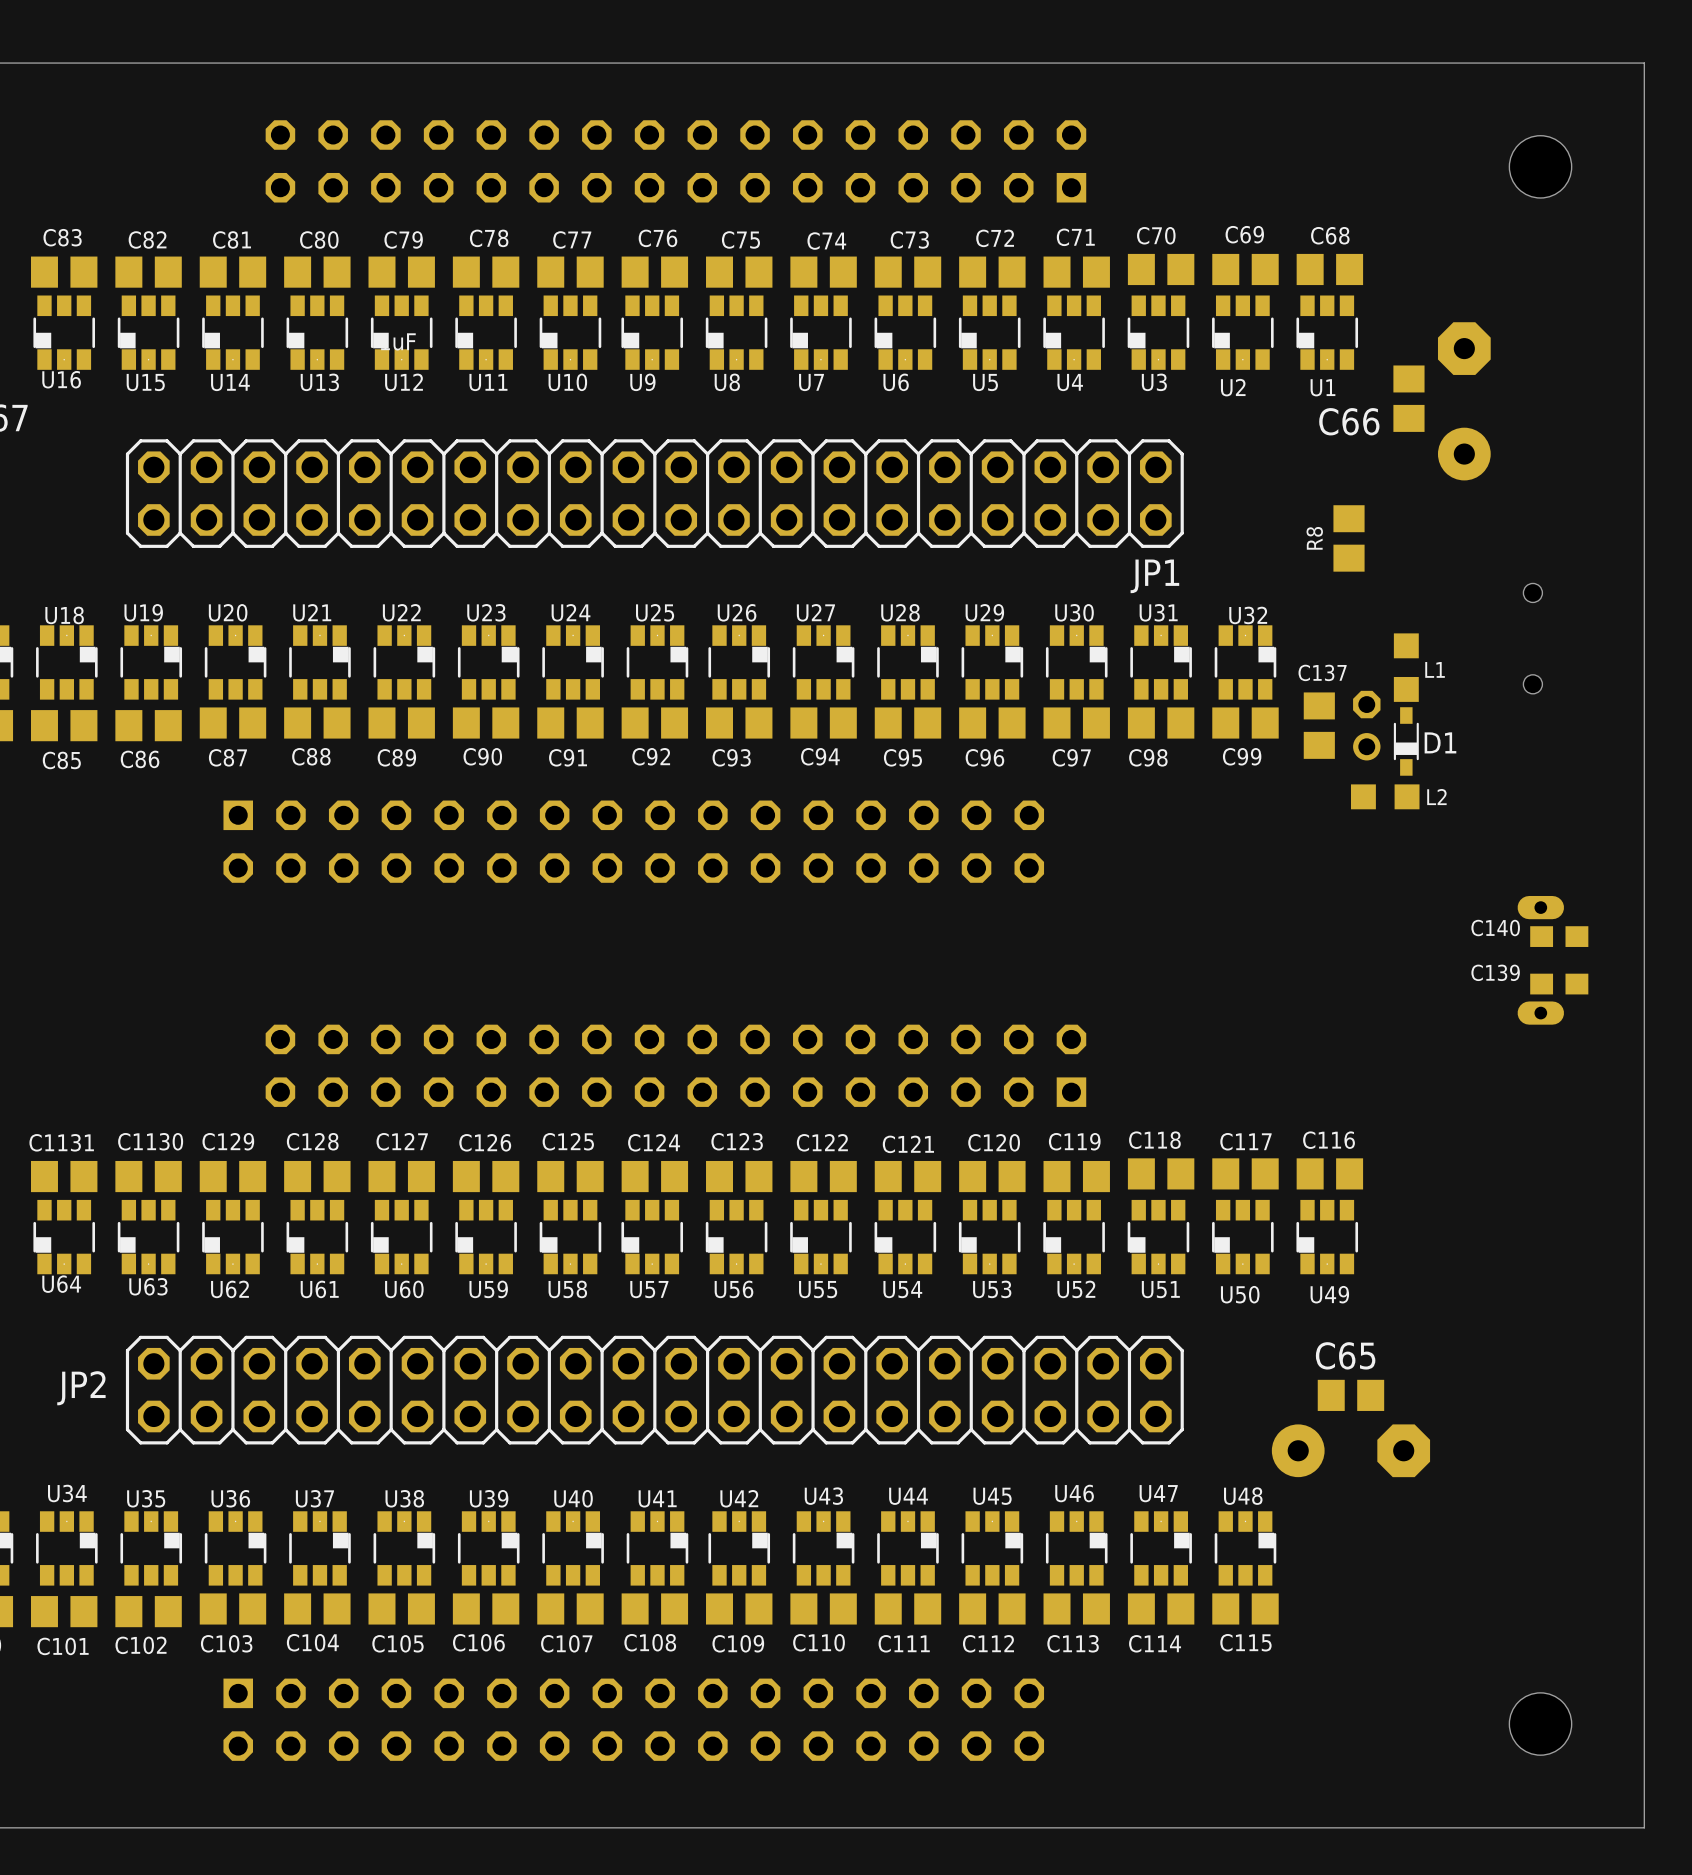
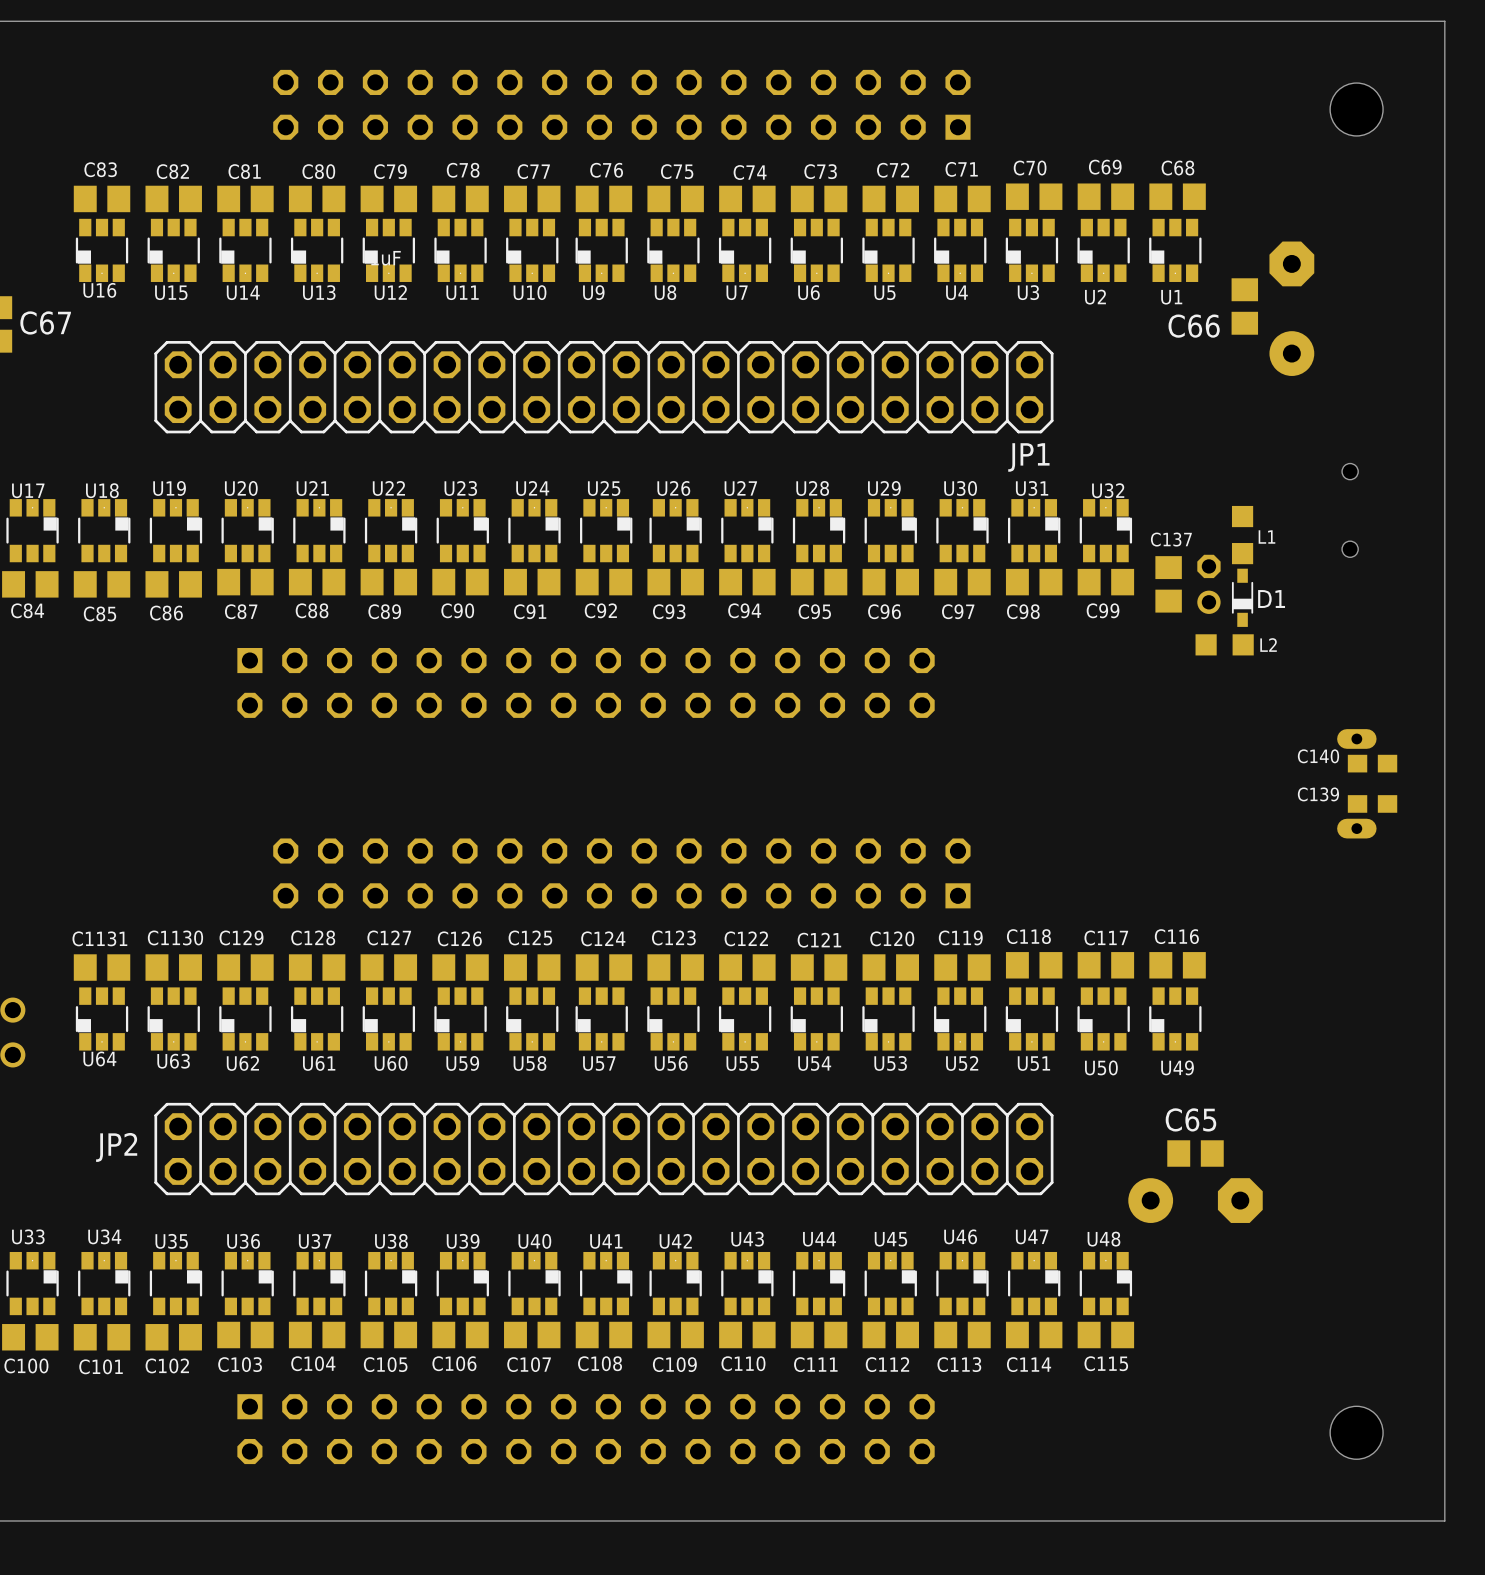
R8: (1349, 538) -> none

